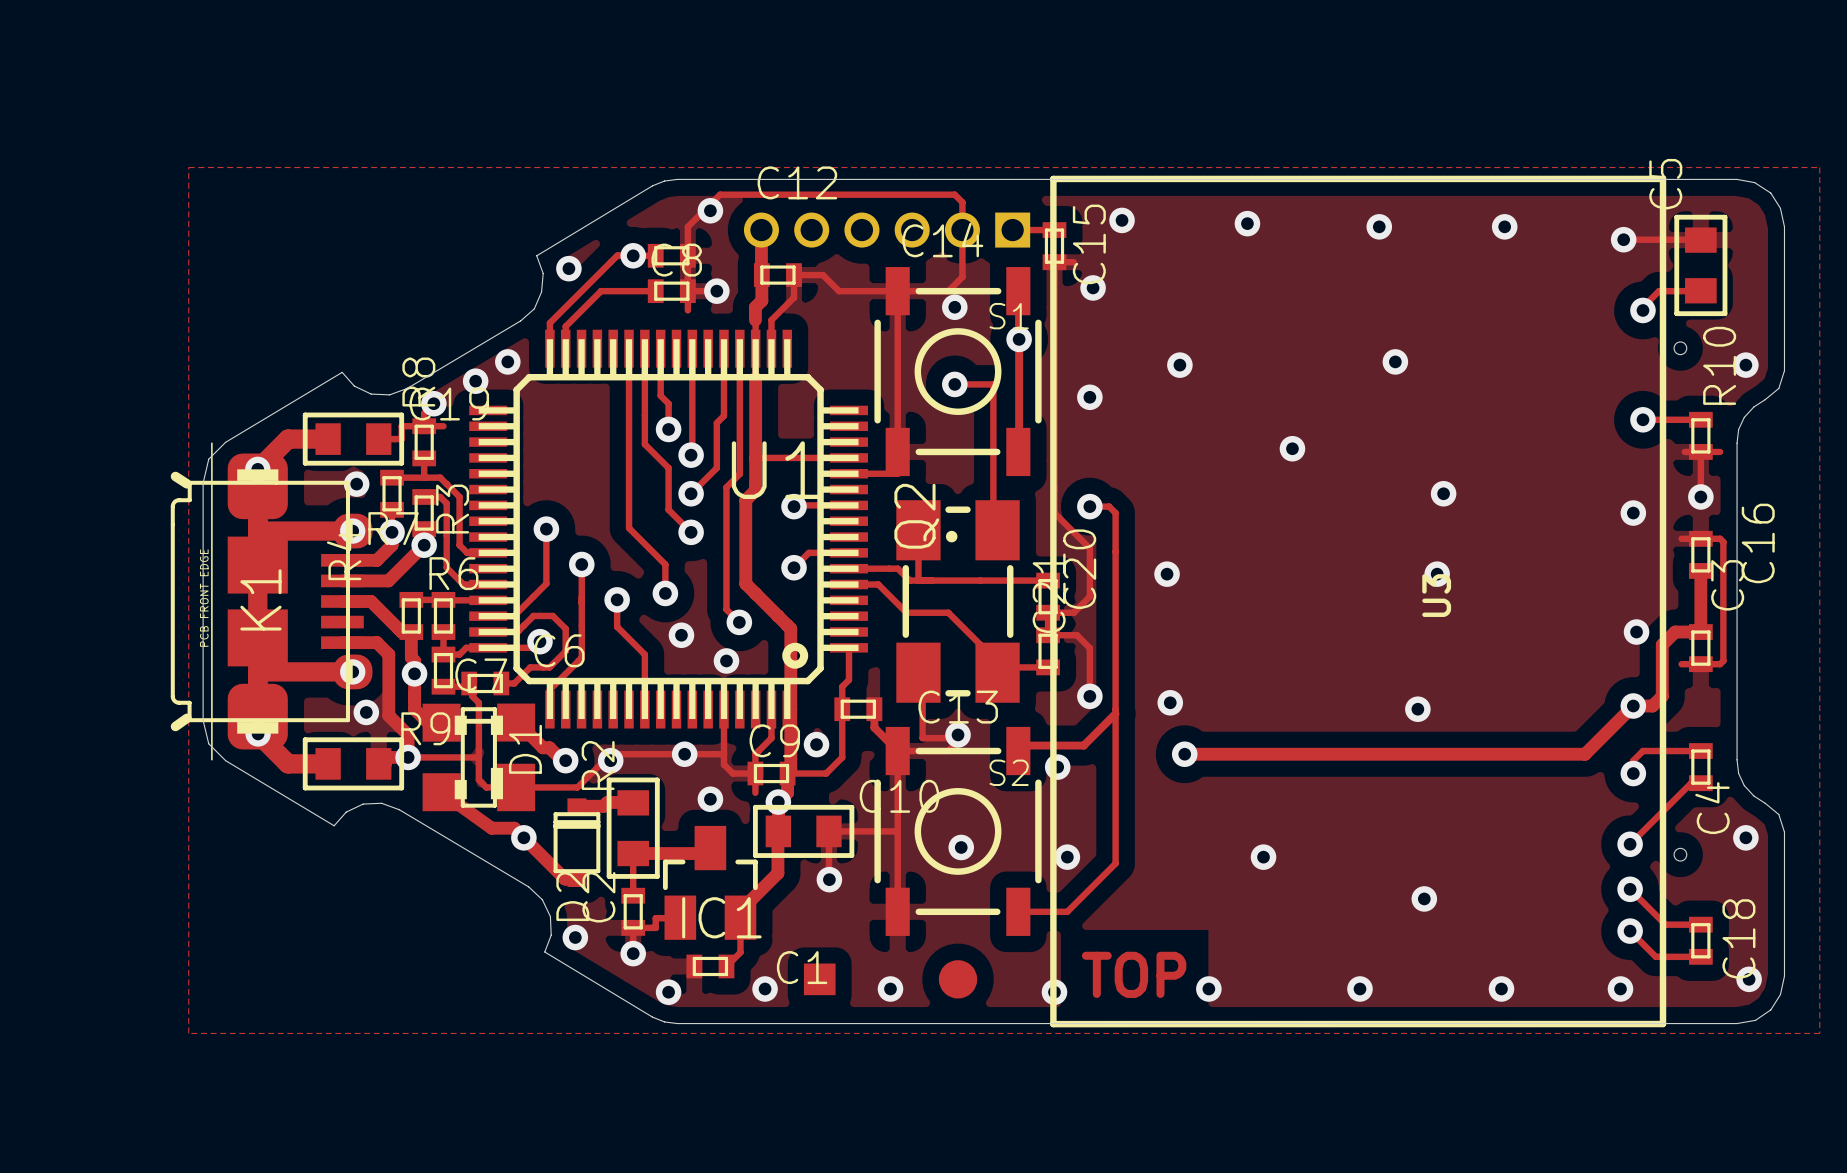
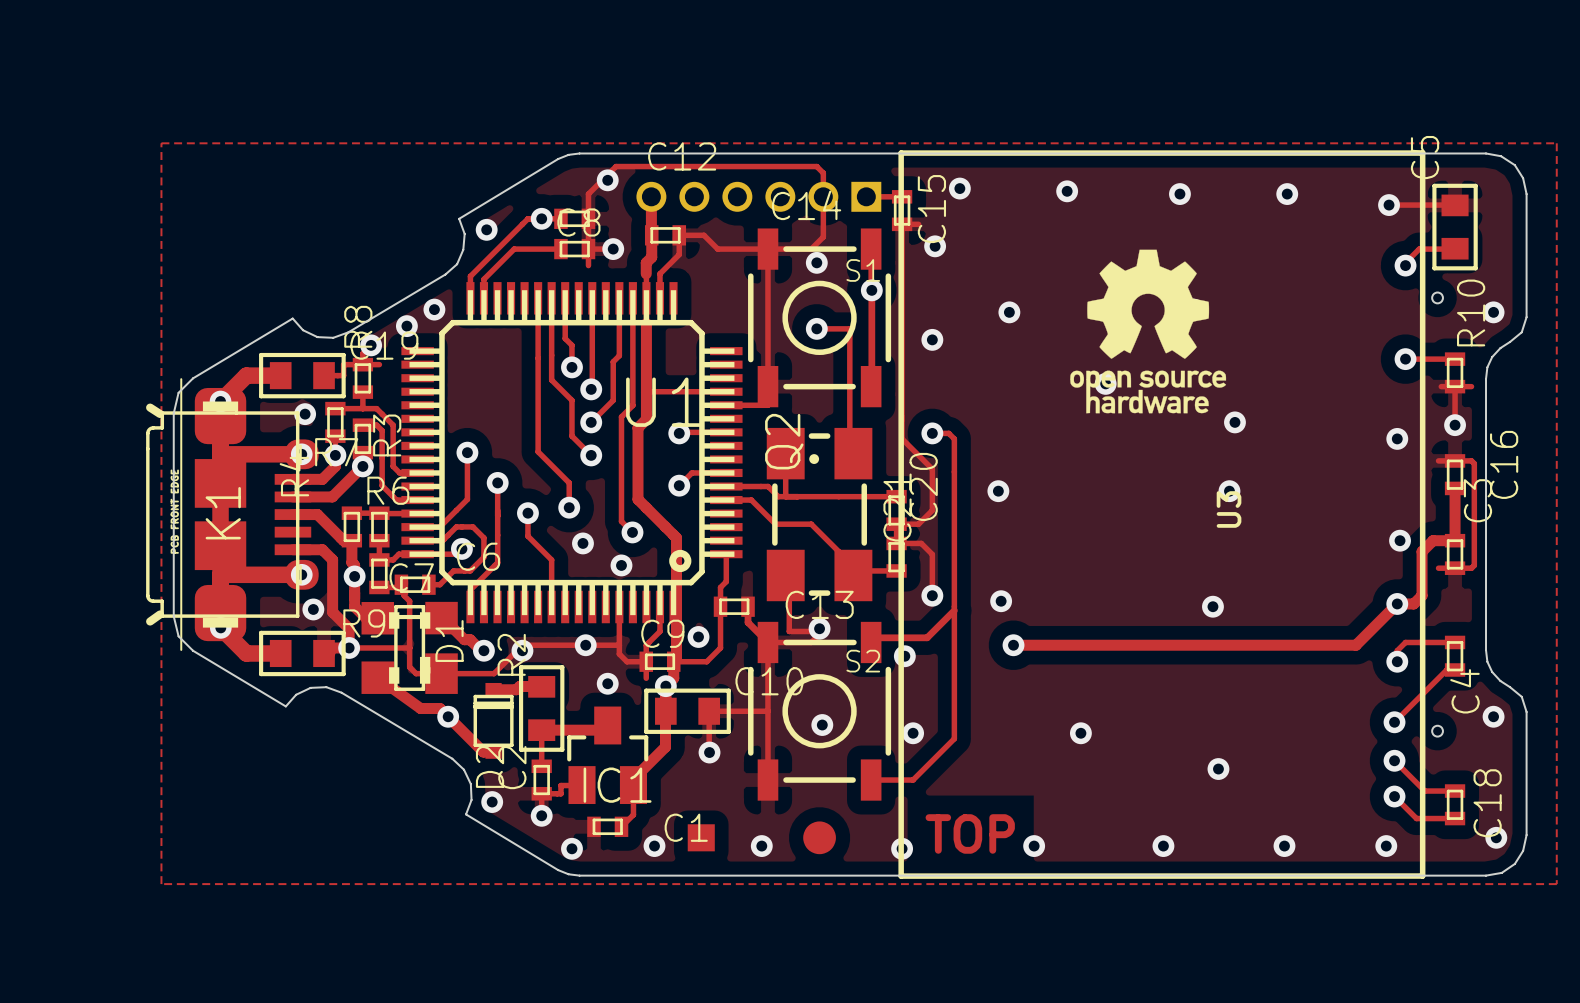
drawing: none -> [1070, 249, 1227, 414]

